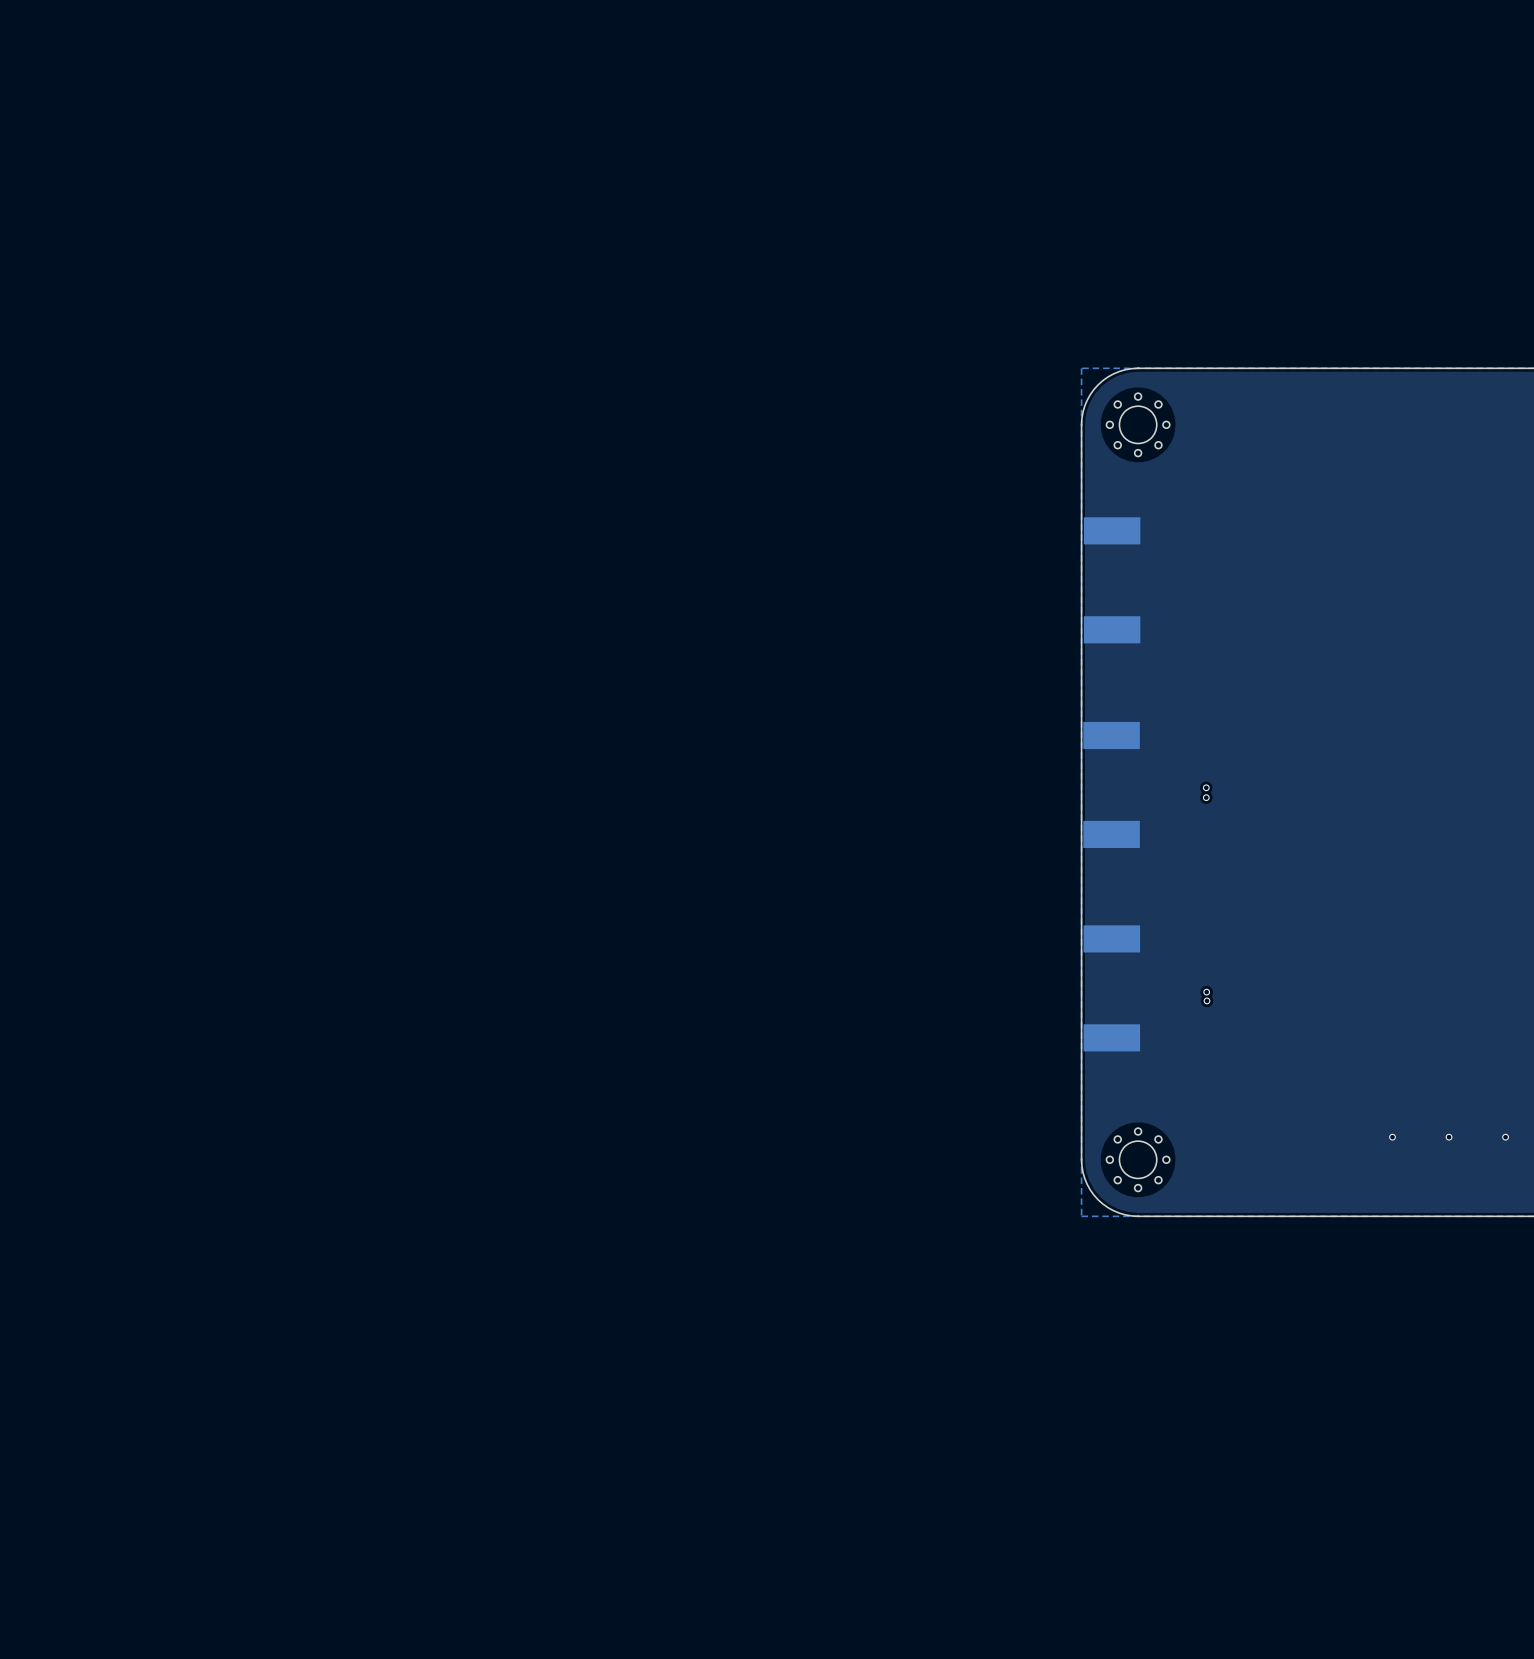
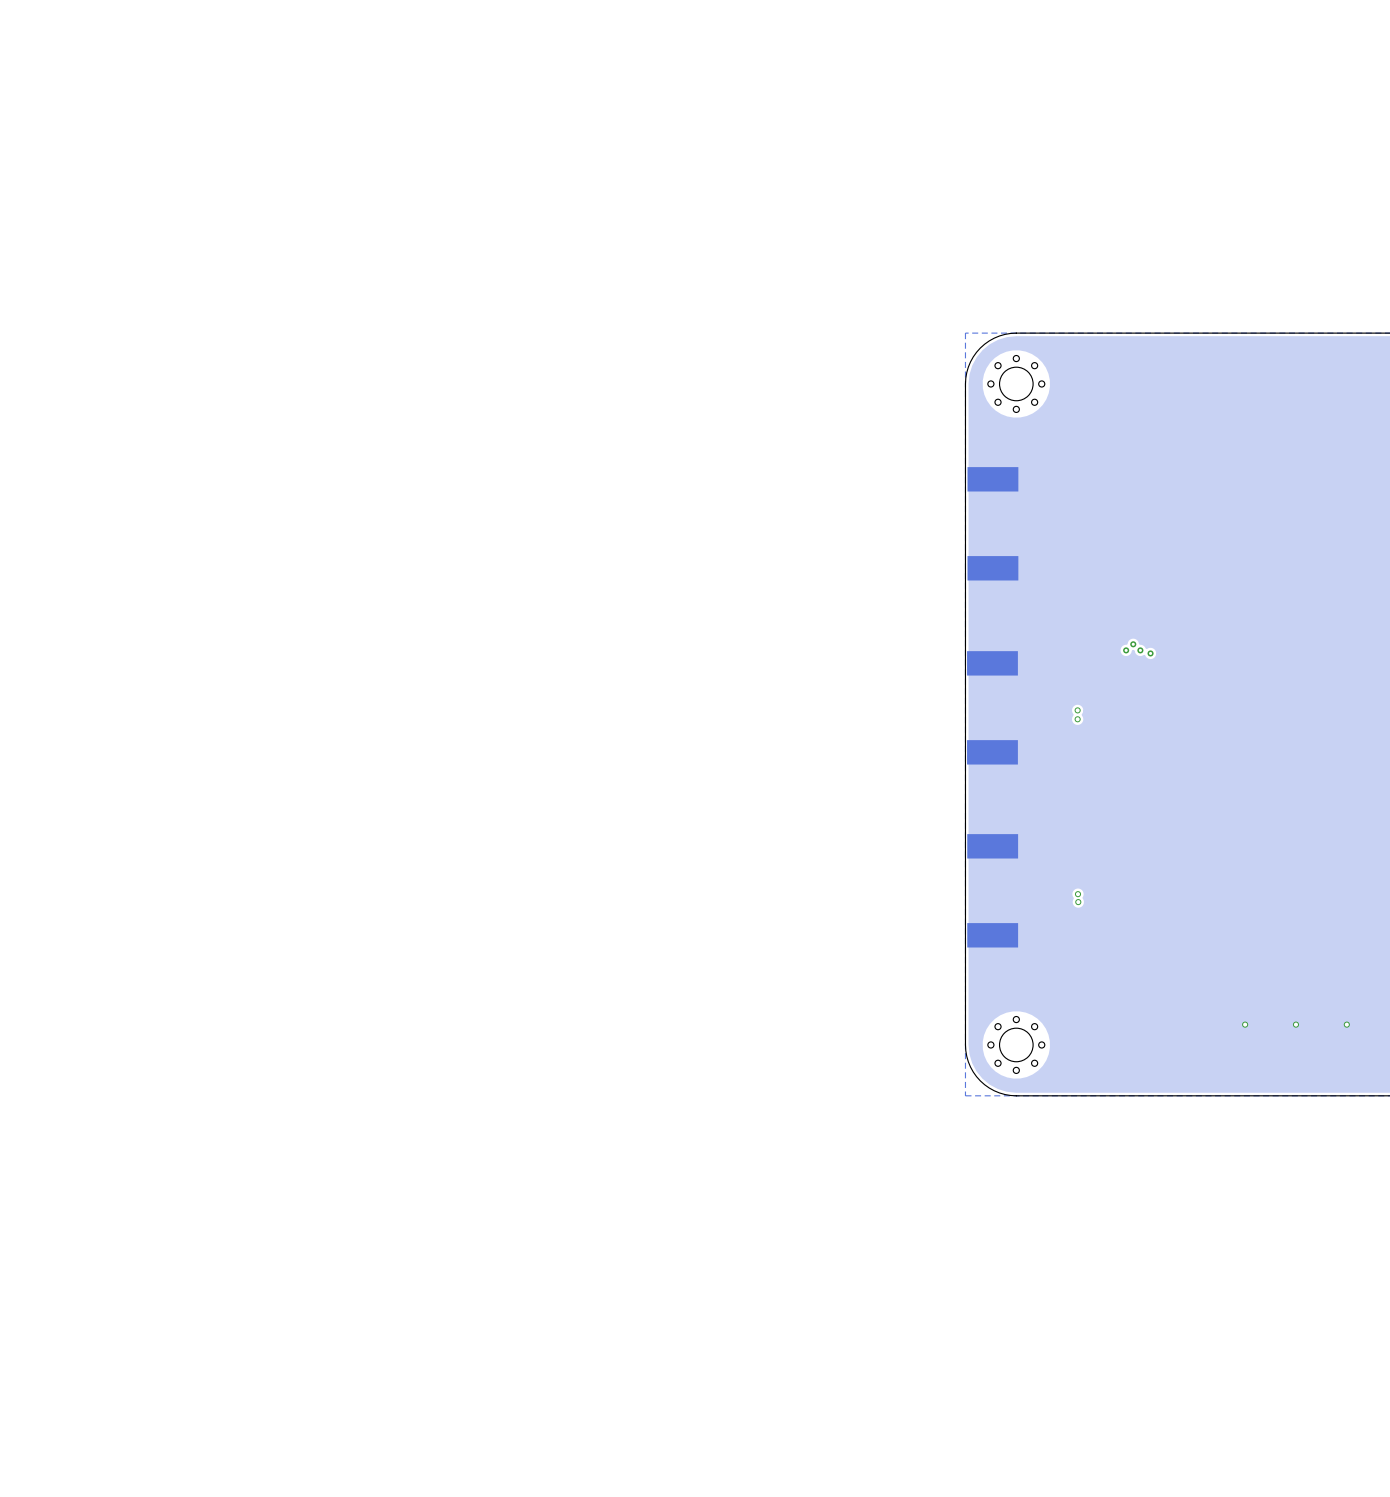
via: none -> (1133, 644)
via: none -> (1126, 650)
via: none -> (1140, 650)
via: none -> (1150, 653)

